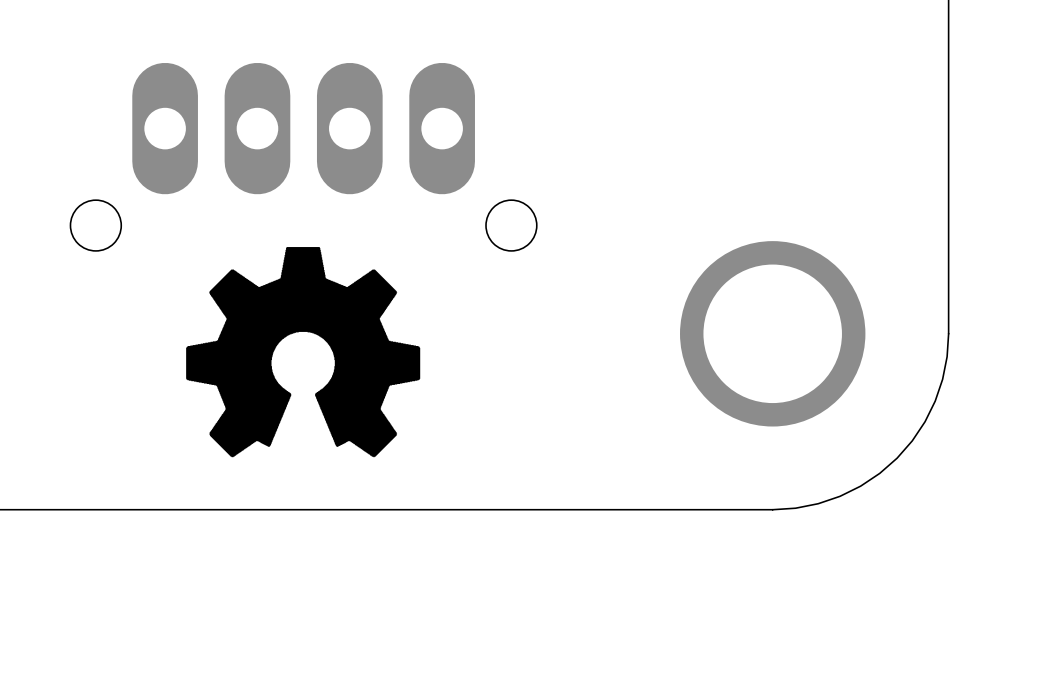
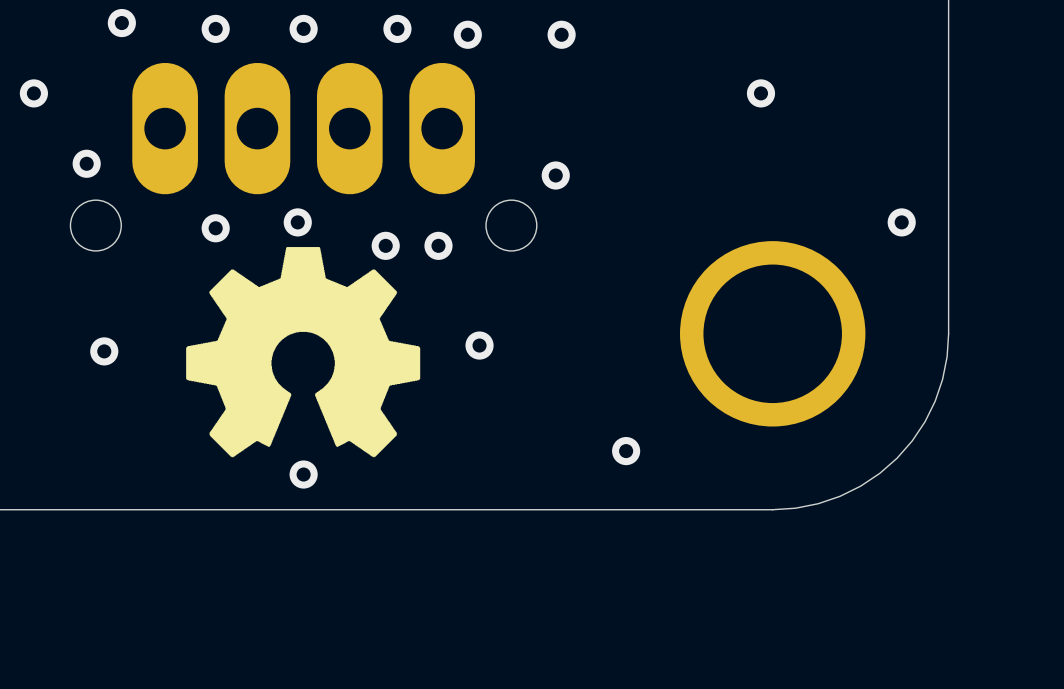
via: none -> (121, 23)
via: none -> (215, 28)
via: none -> (303, 28)
via: none -> (397, 28)
via: none -> (467, 34)
via: none -> (561, 34)
via: none -> (33, 93)
via: none -> (760, 93)
via: none -> (86, 163)
via: none -> (555, 175)
via: none -> (297, 222)
via: none -> (901, 222)
via: none -> (215, 228)
via: none -> (385, 245)
via: none -> (438, 245)
via: none -> (479, 345)
via: none -> (104, 351)
via: none -> (626, 451)
via: none -> (303, 474)

